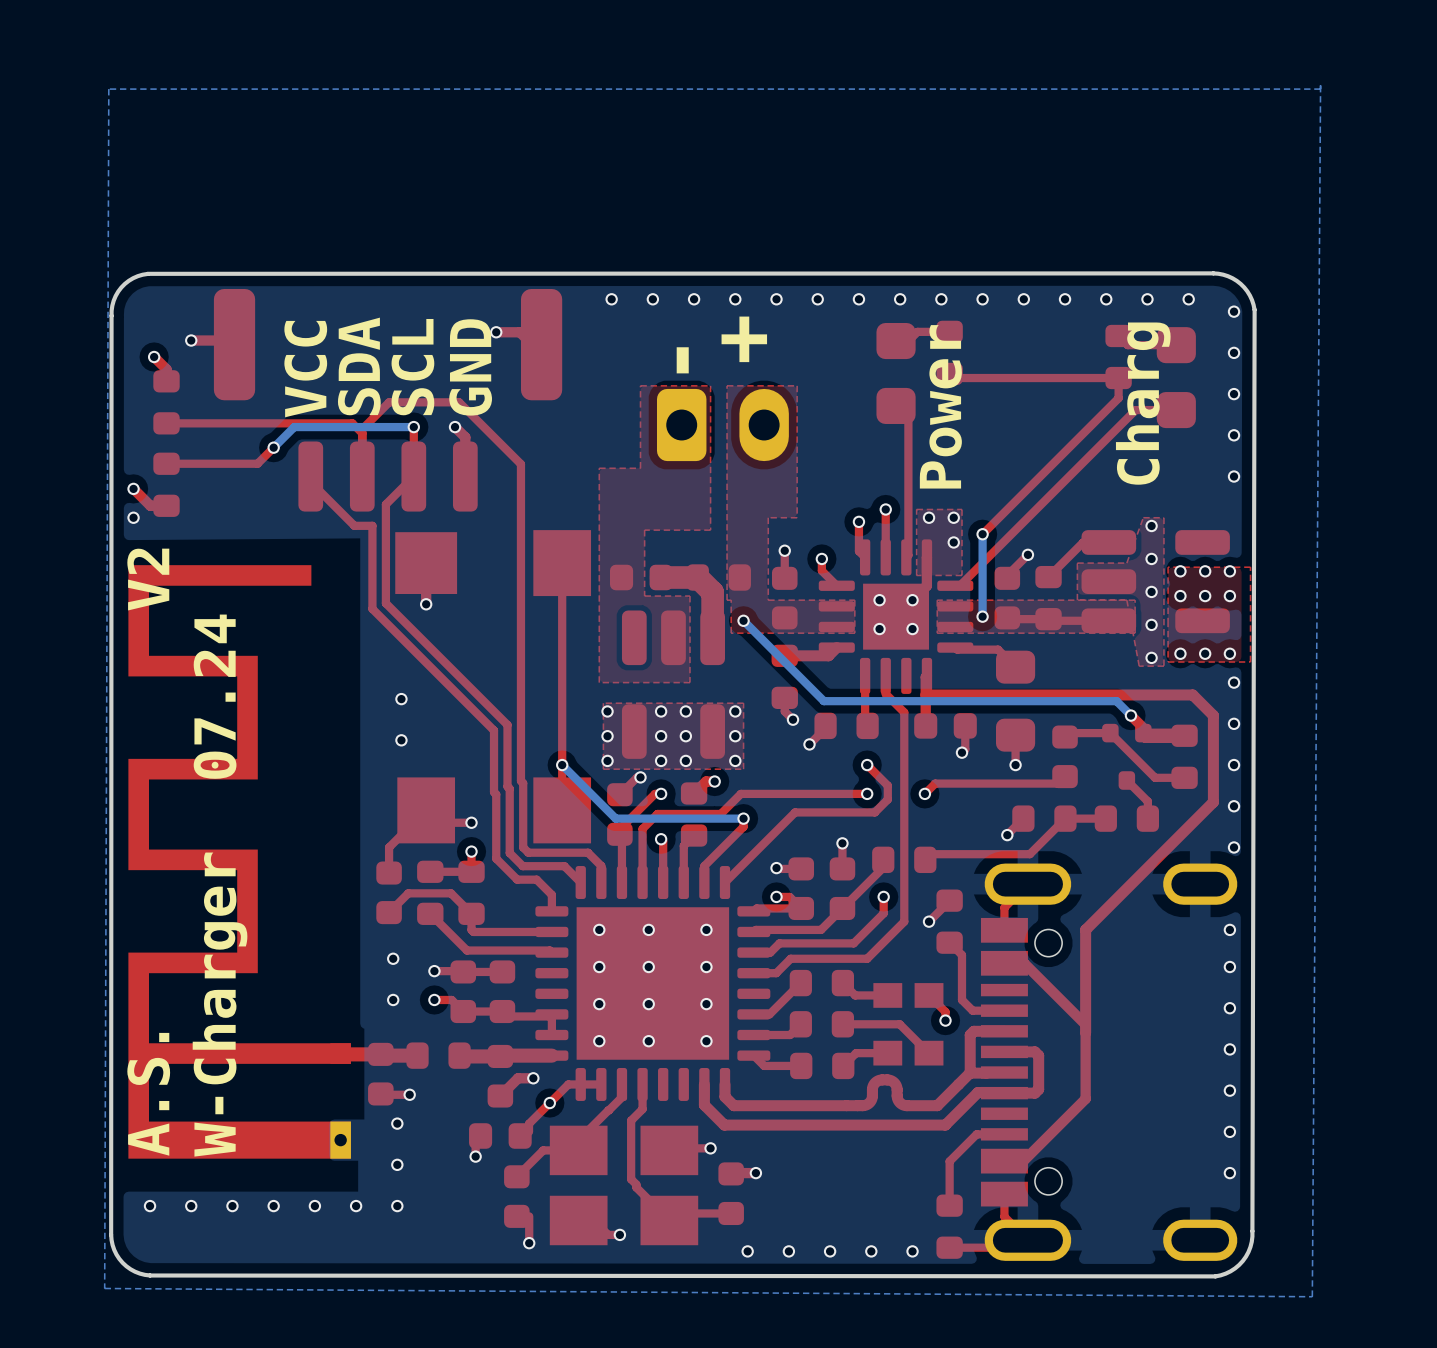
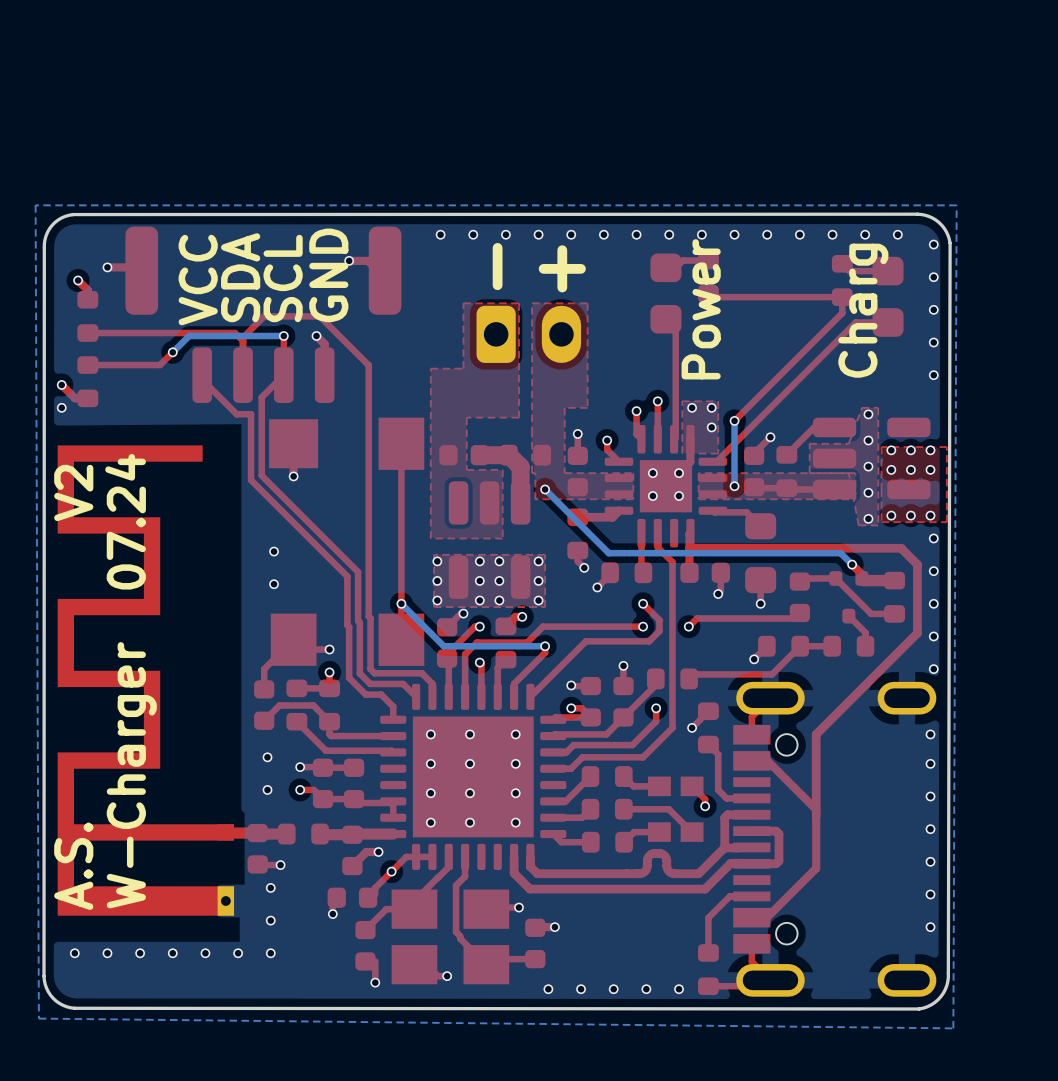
bottom zone outline: (1320, 84) (1312, 1296) (104, 1288) (108, 89) (1320, 89) (1320, 84) -> (956, 205) (953, 1028) (38, 1018) (35, 205) (956, 205)

